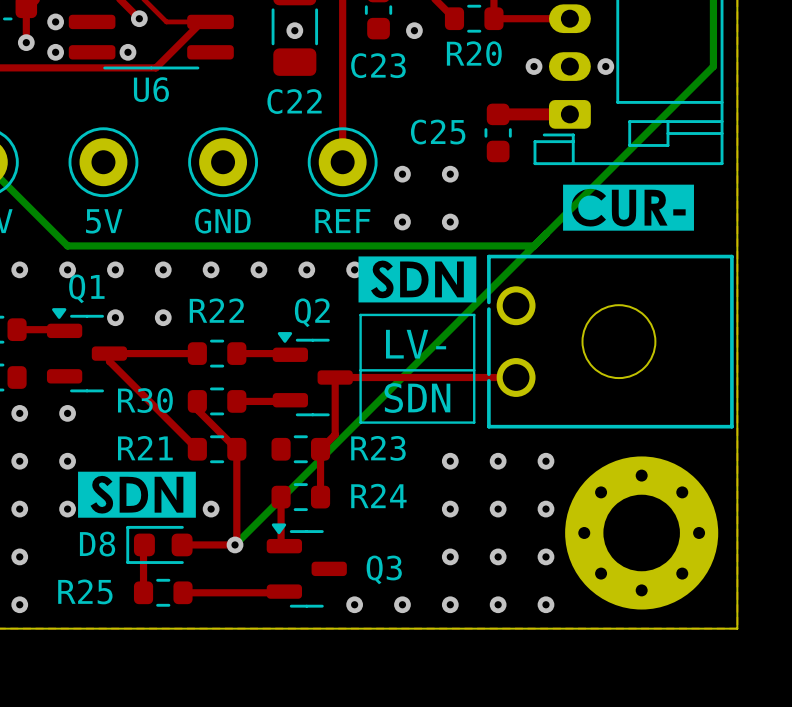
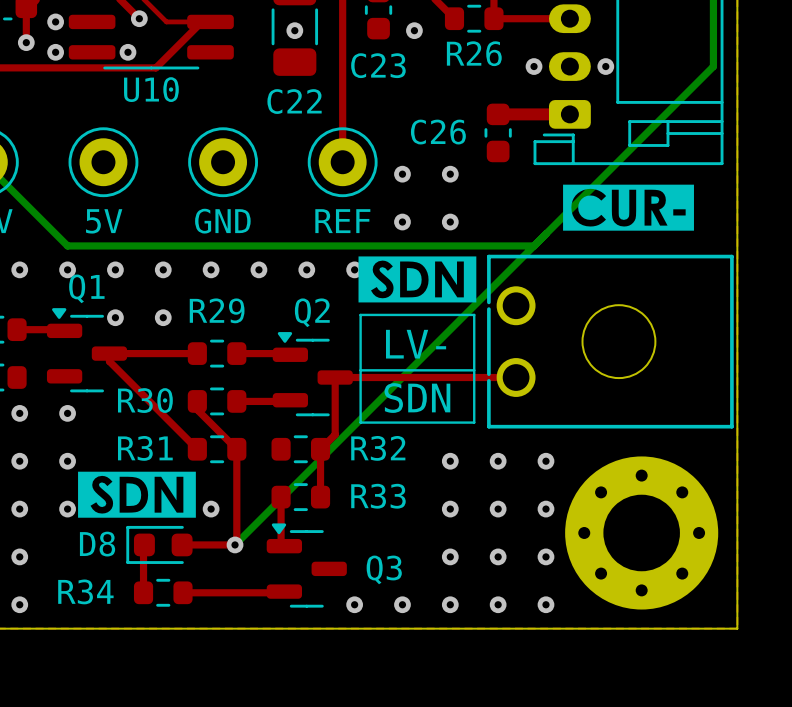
R20 name: R20 (474, 53) -> R26 (474, 53)
U6 name: U6 (151, 89) -> U10 (151, 89)
C25 name: C25 (438, 132) -> C26 (438, 132)
R22 name: R22 (216, 310) -> R29 (217, 310)
R21 name: R21 (145, 448) -> R31 (145, 448)
R23 name: R23 (378, 448) -> R32 (378, 448)
R24 name: R24 (378, 496) -> R33 (378, 496)
R25 name: R25 (85, 591) -> R34 (85, 591)

